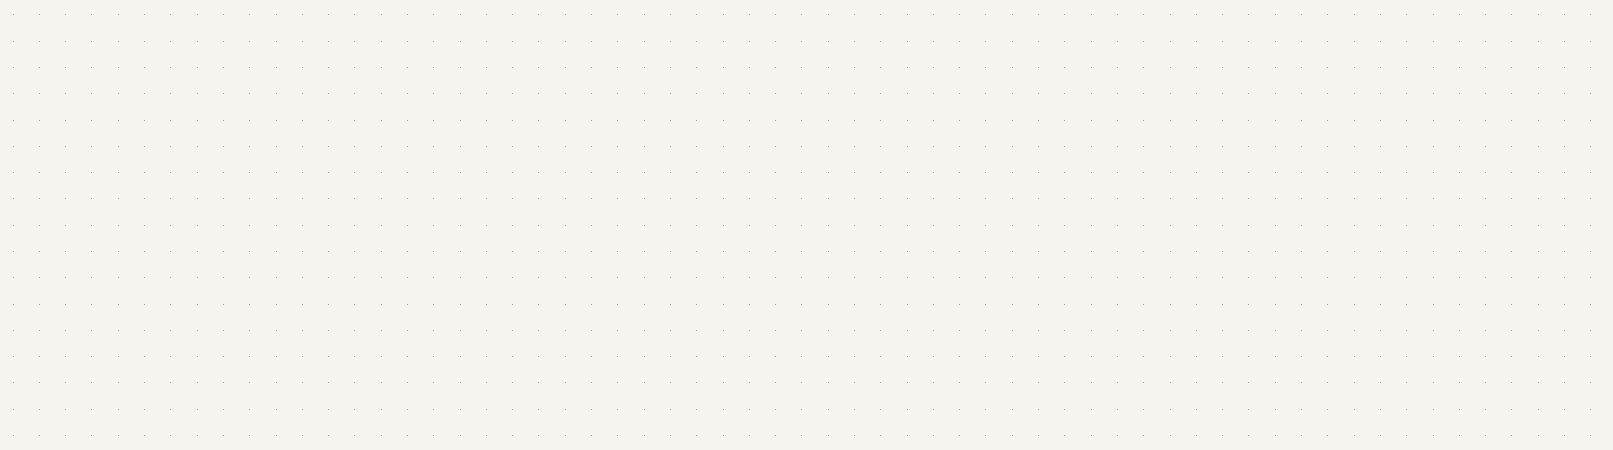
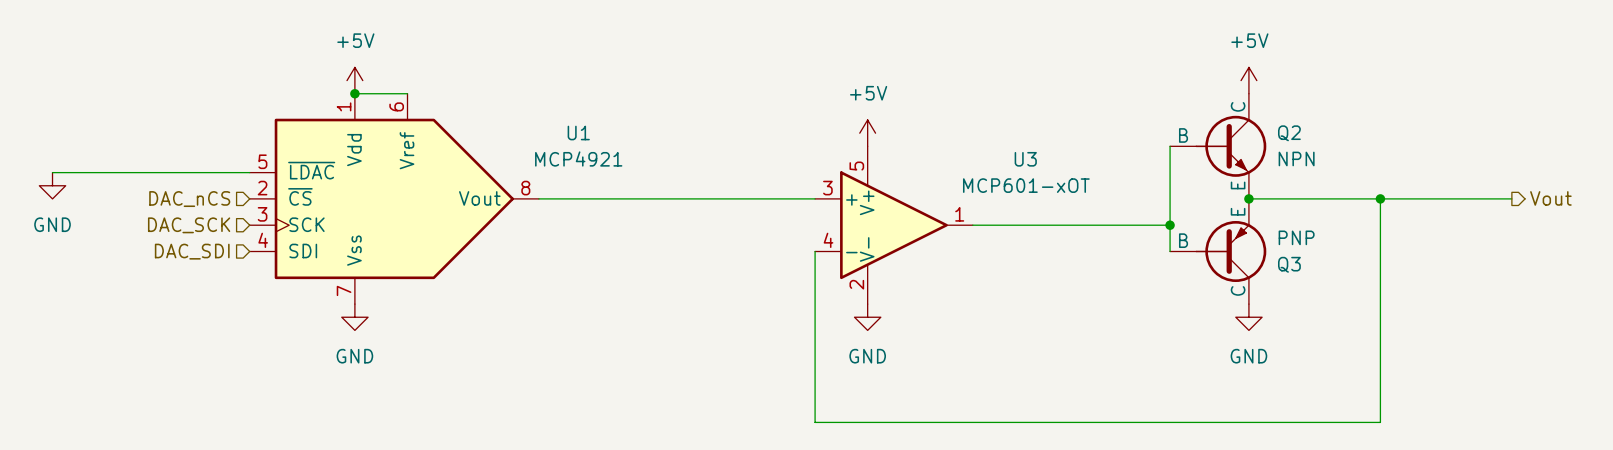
power symbol: none -> +5V (354, 80)
power symbol: none -> +5V (1248, 80)
wire: none -> (354, 93) (407, 93)
junction: none -> (354, 93)
power symbol: none -> +5V (867, 133)
wire: none -> (1170, 146) (1170, 251)
Q2: none -> NPN (1218, 146)
wire: none -> (52, 172) (249, 172)
power symbol: none -> GND (52, 185)
U1: none -> MCP4921 (394, 198)
wire: none -> (538, 198) (815, 198)
wire: none -> (1248, 198) (1511, 198)
junction: none -> (1248, 198)
wire: none -> (1380, 198) (1380, 422) (815, 422) (815, 251)
junction: none -> (1380, 198)
hierarchical label: none -> Vout (1550, 198)
hierarchical label: none -> DAC_nCS (189, 199)
hierarchical label: none -> DAC_SCK (189, 225)
U3: none -> MCP601-xOT (893, 225)
wire: none -> (972, 225) (1170, 225)
junction: none -> (1170, 225)
hierarchical label: none -> DAC_SDI (192, 251)
Q3: none -> PNP (1218, 251)
power symbol: none -> GND (354, 317)
power symbol: none -> GND (867, 317)
power symbol: none -> GND (1248, 317)

